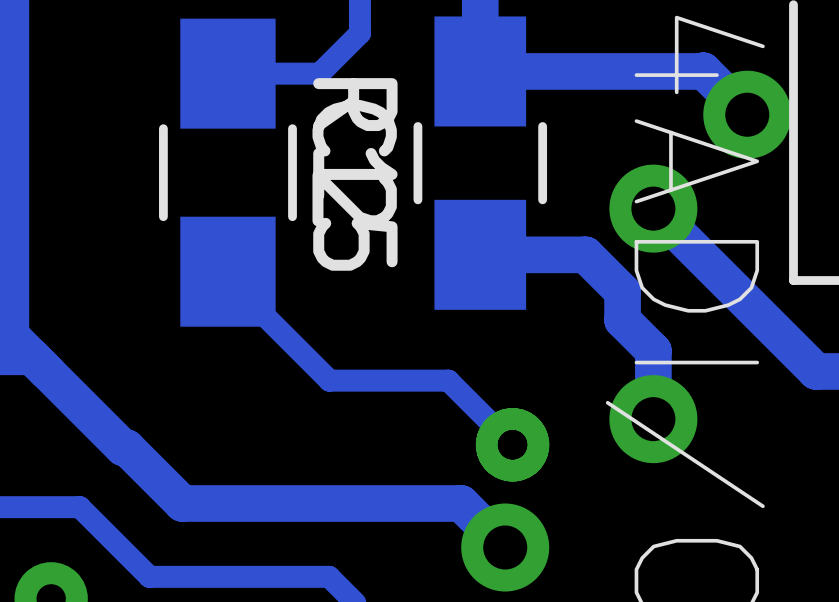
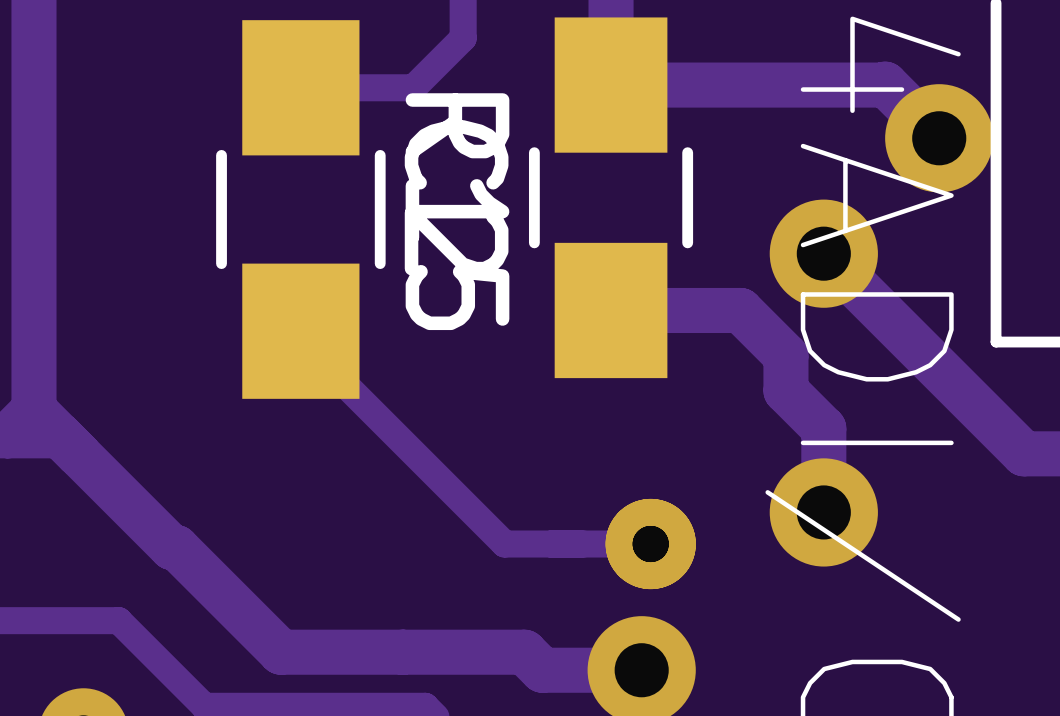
track: (329, 380) (448, 380) (512, 444) -> (425, 465) (504, 544) (650, 544)
track: (182, 503) (461, 503) (505, 547) -> (244, 616) (281, 652) (524, 652) (542, 670) (641, 670)

